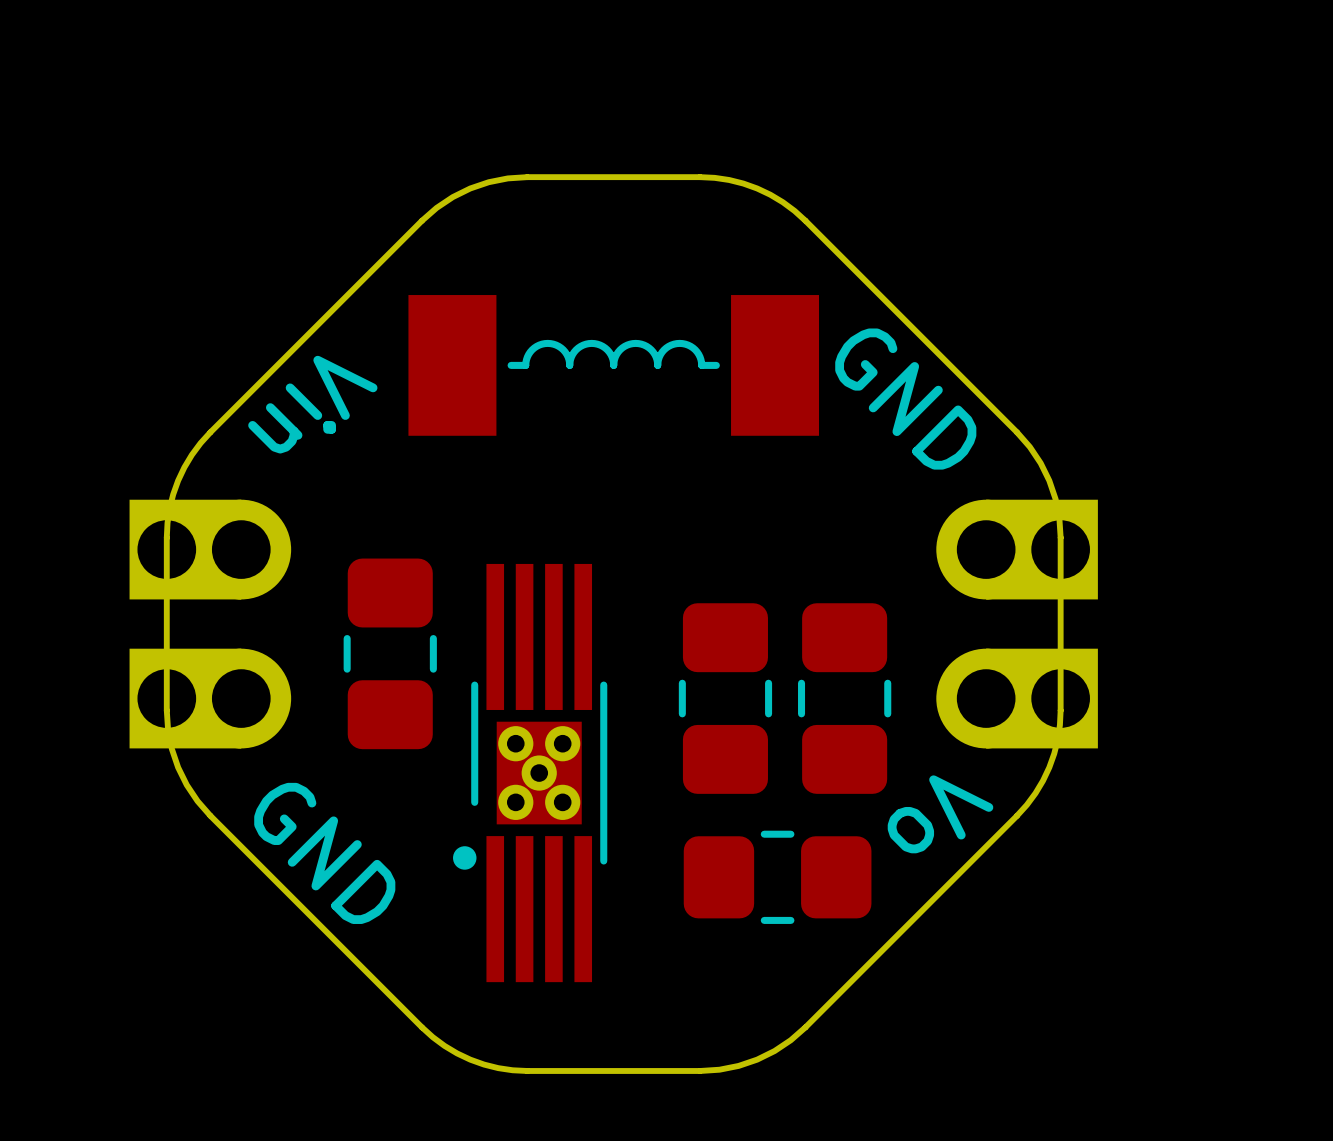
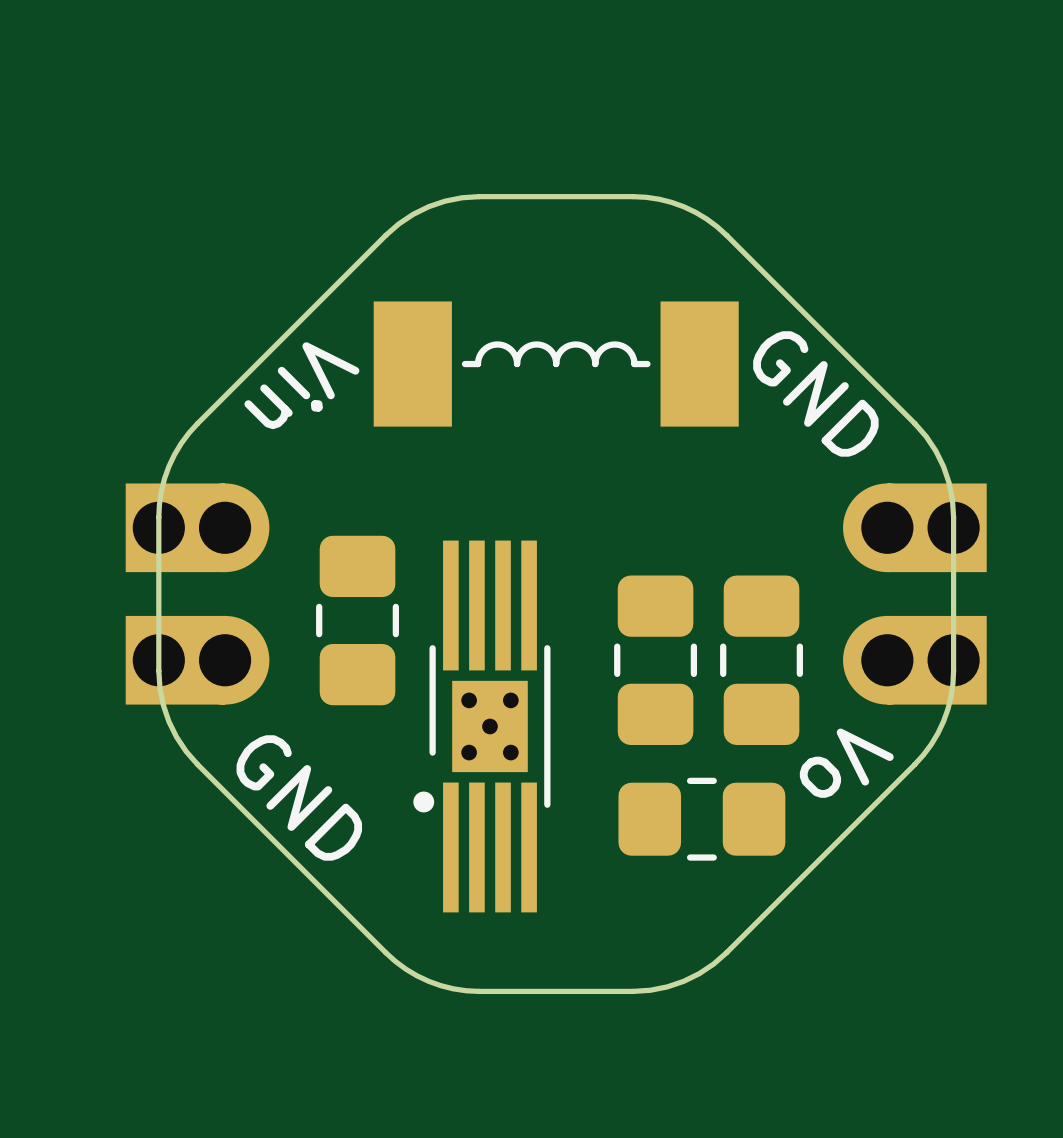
text position: Vin (312, 404) -> Vin (301, 385)

